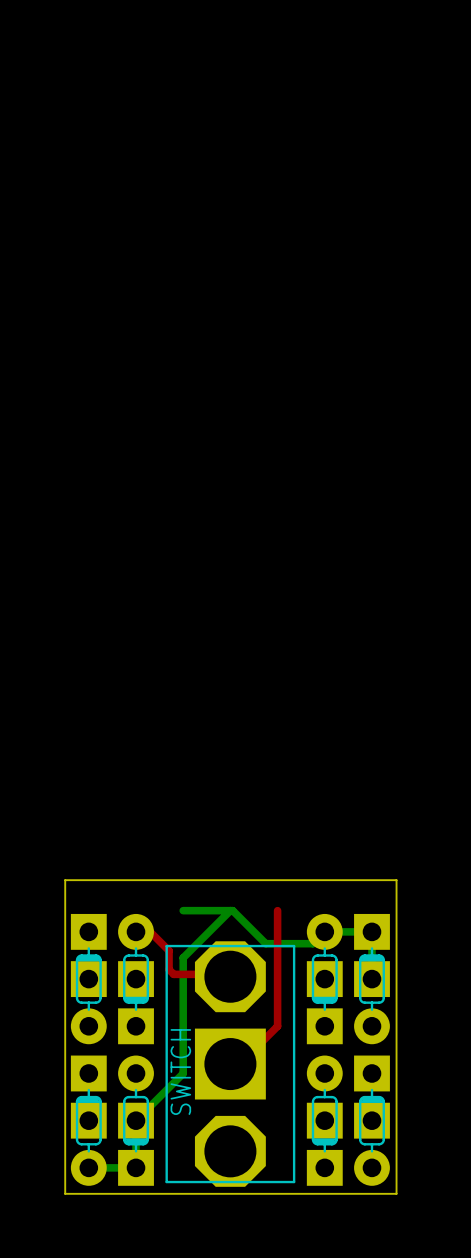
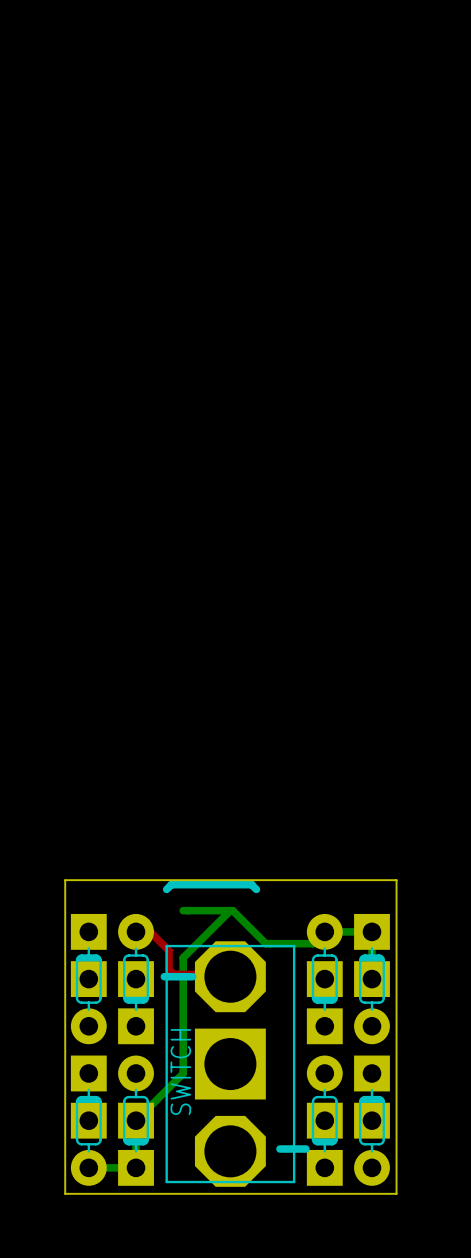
line: none -> (166, 889) (171, 884) (251, 884) (256, 889)
top track: (277, 910) (277, 1026) (239, 1064) (230, 1064) -> none
line: none -> (164, 976) (192, 976)
line: none -> (279, 1149) (305, 1149)

